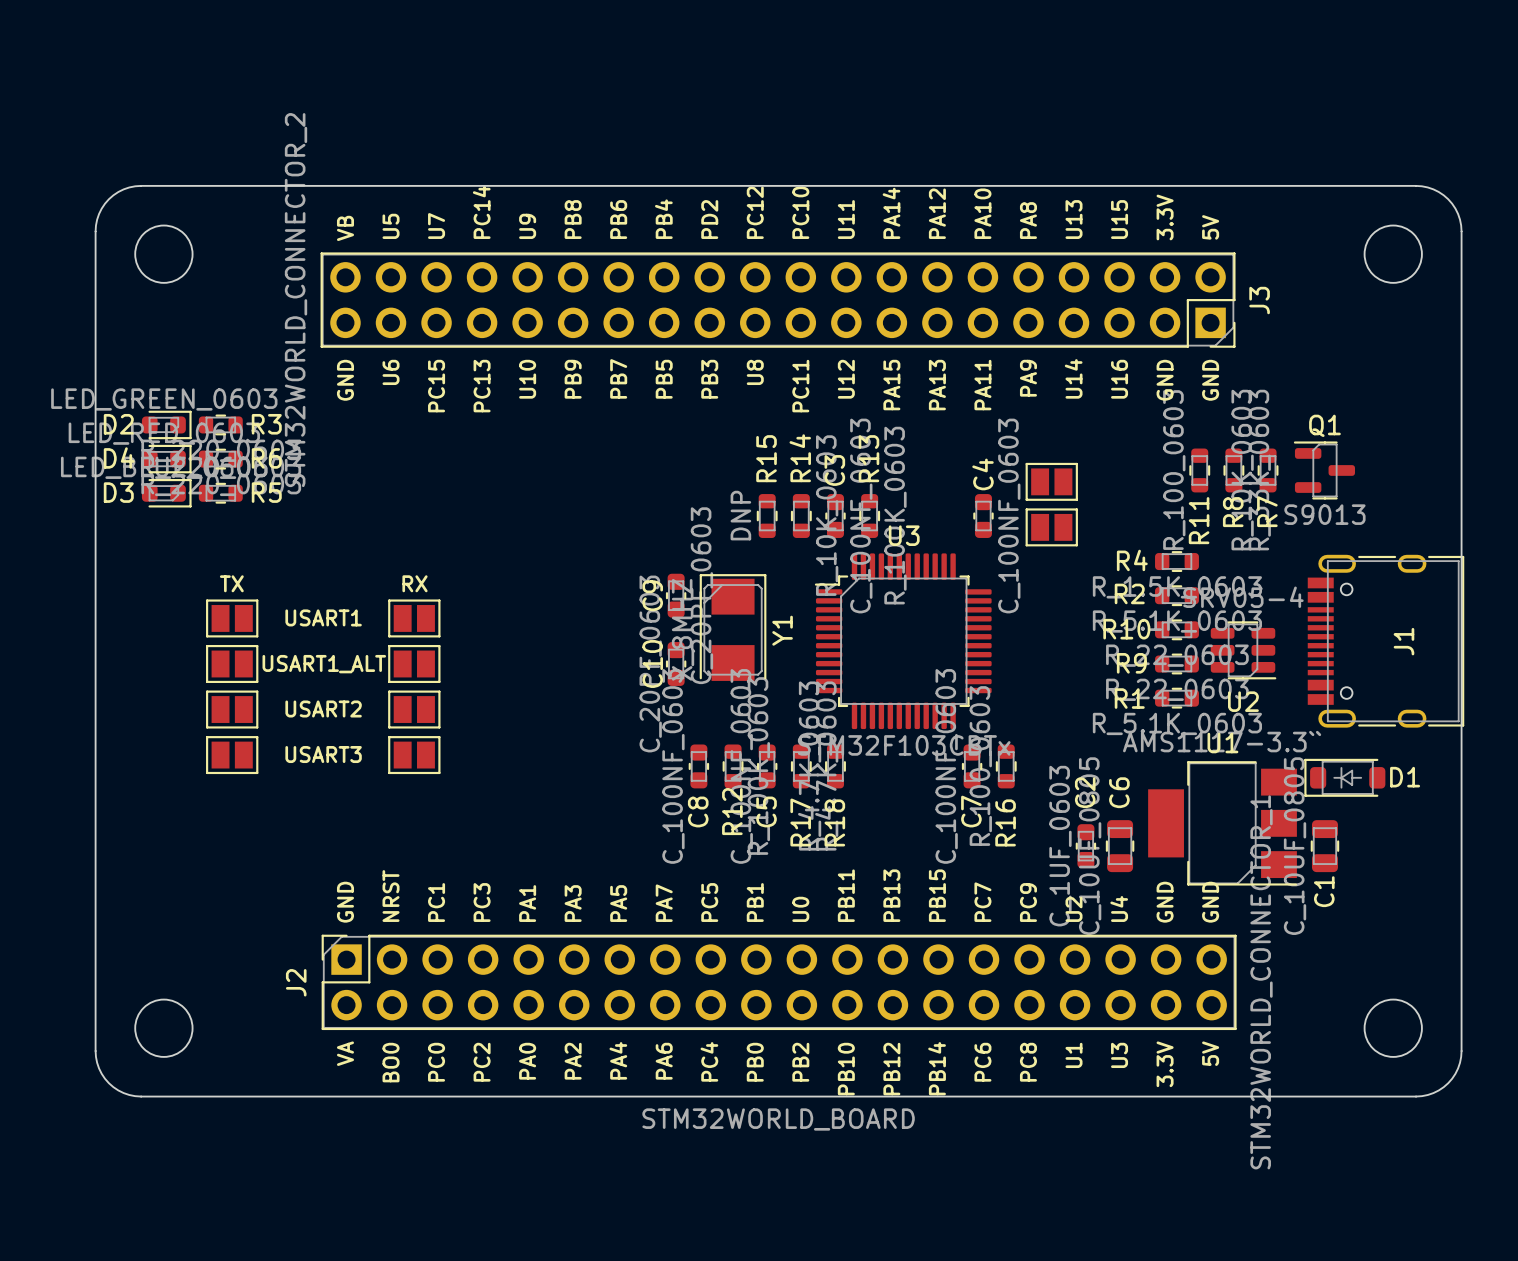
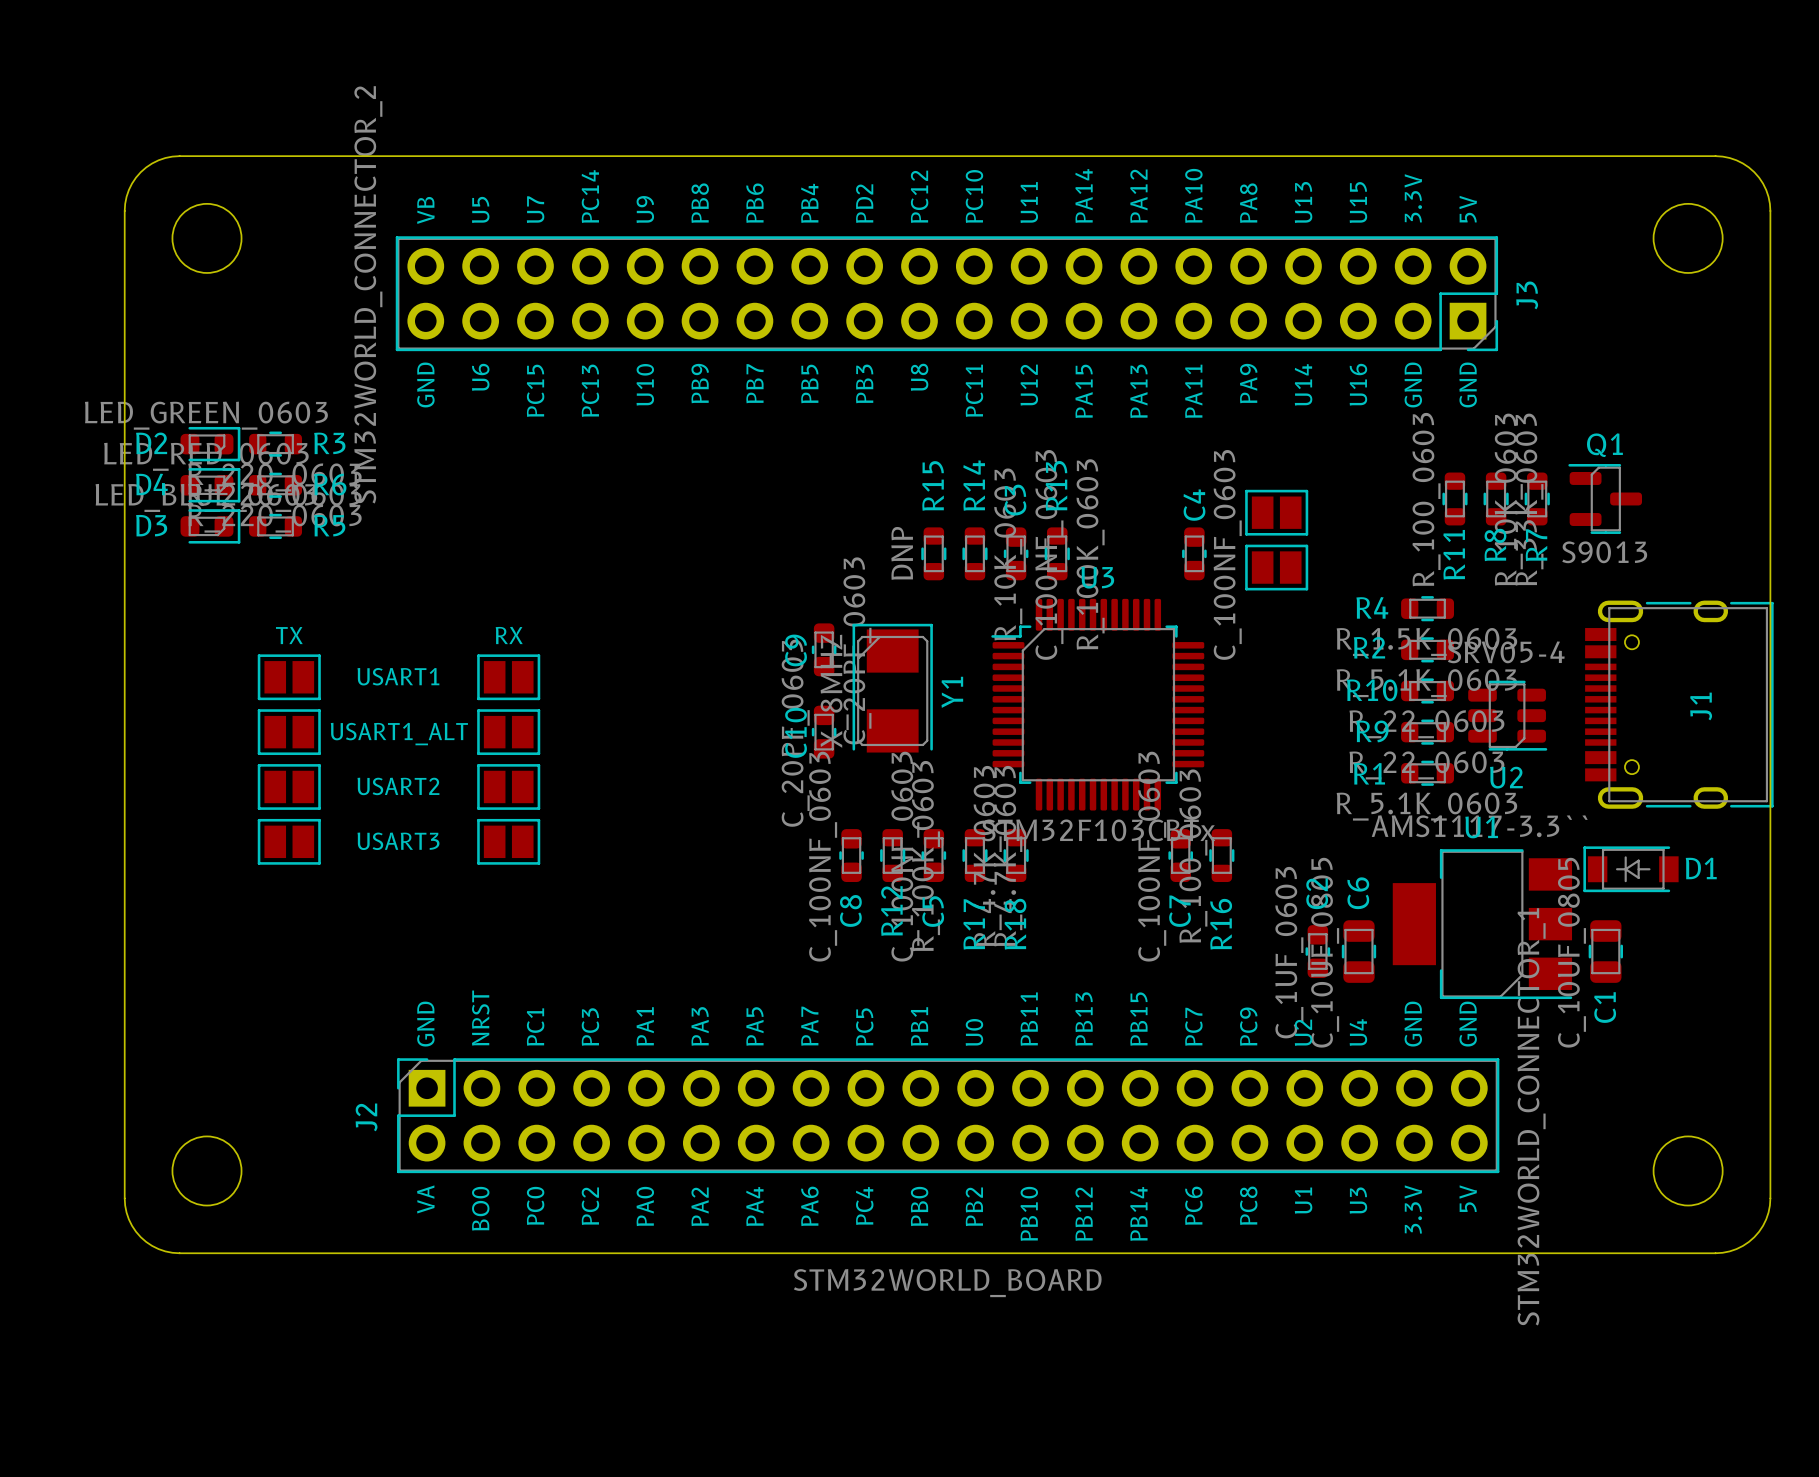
D1 footprint: [1304, 758, 1386, 797] -> [1583, 846, 1679, 893]

